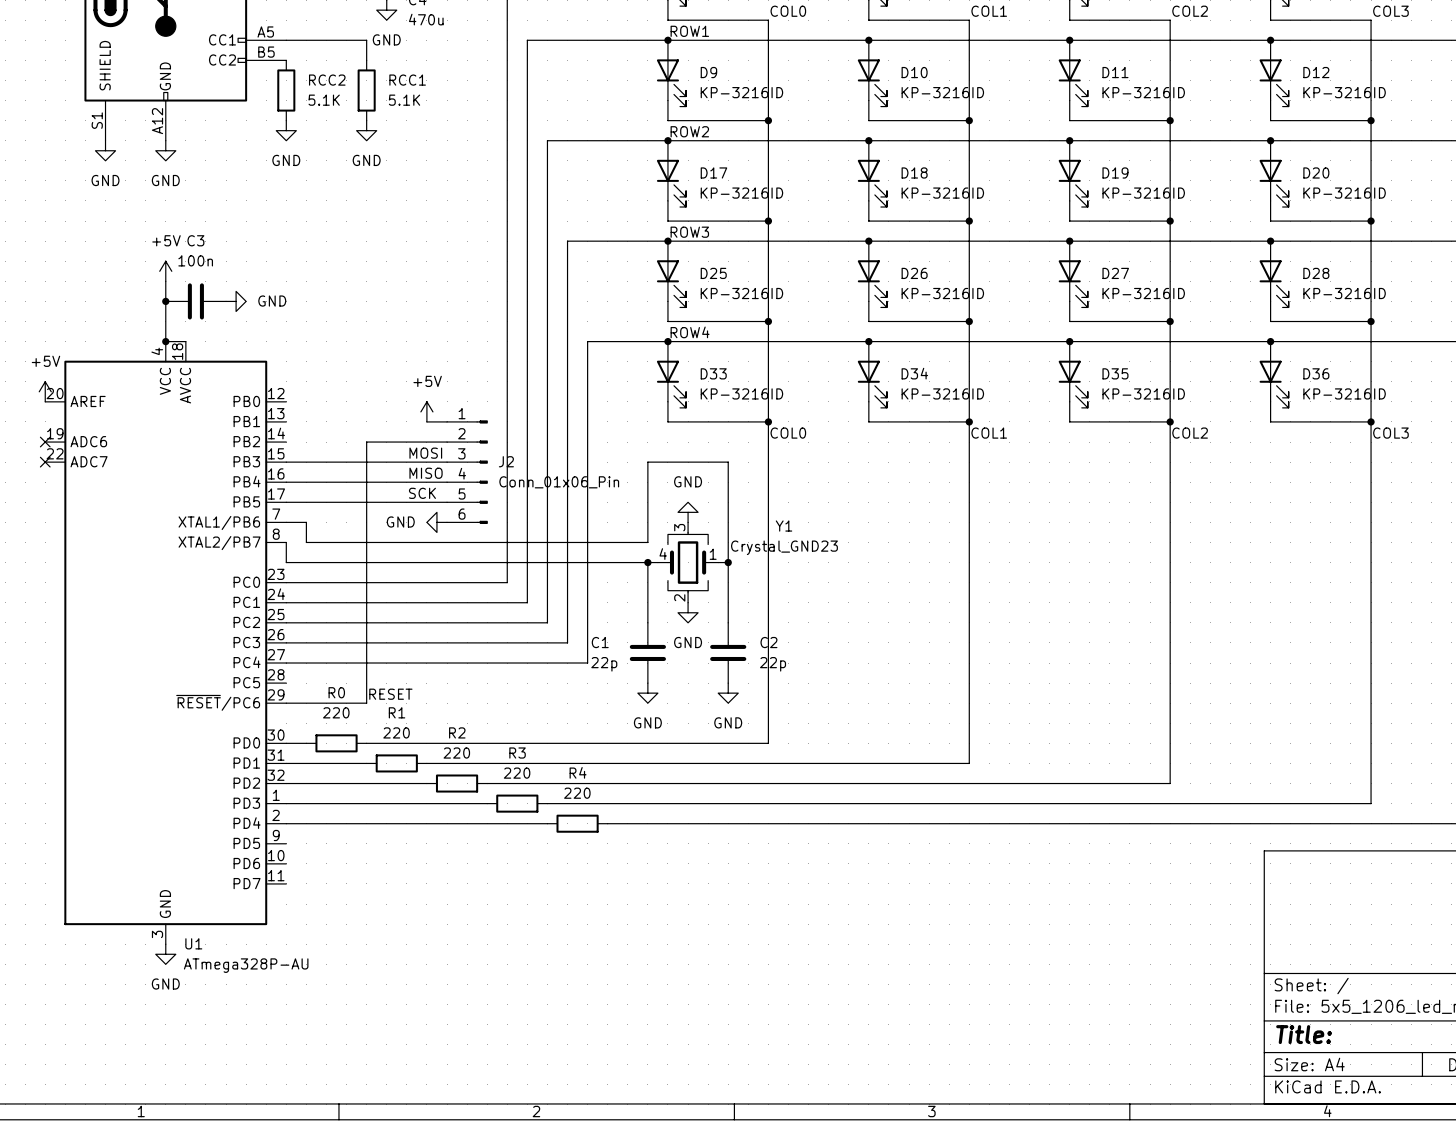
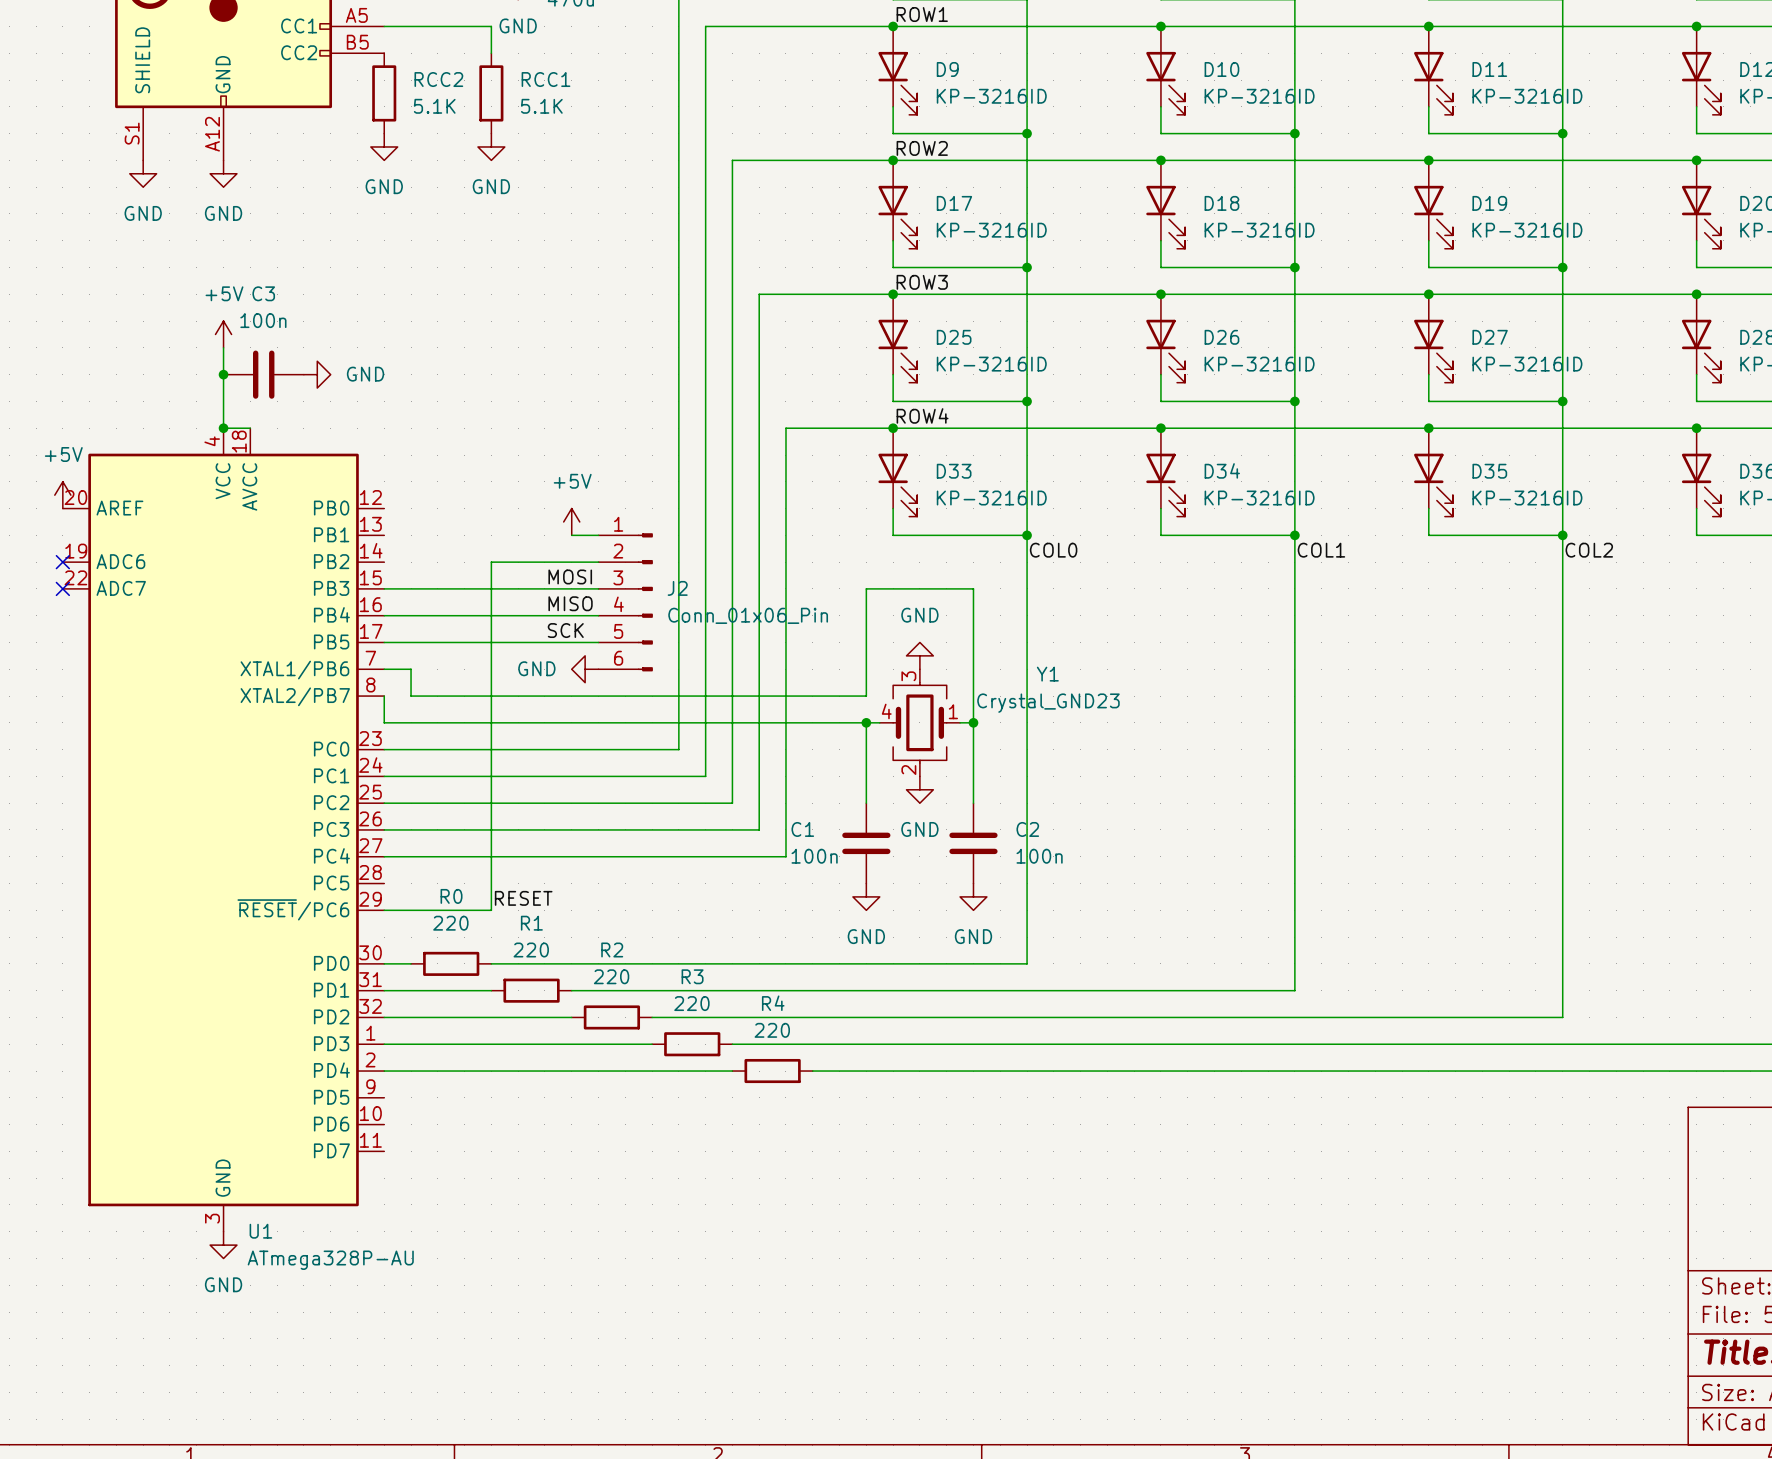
C1 value: 22p (604, 664) -> 100n (814, 856)
C2 value: 22p (773, 664) -> 100n (1039, 856)

